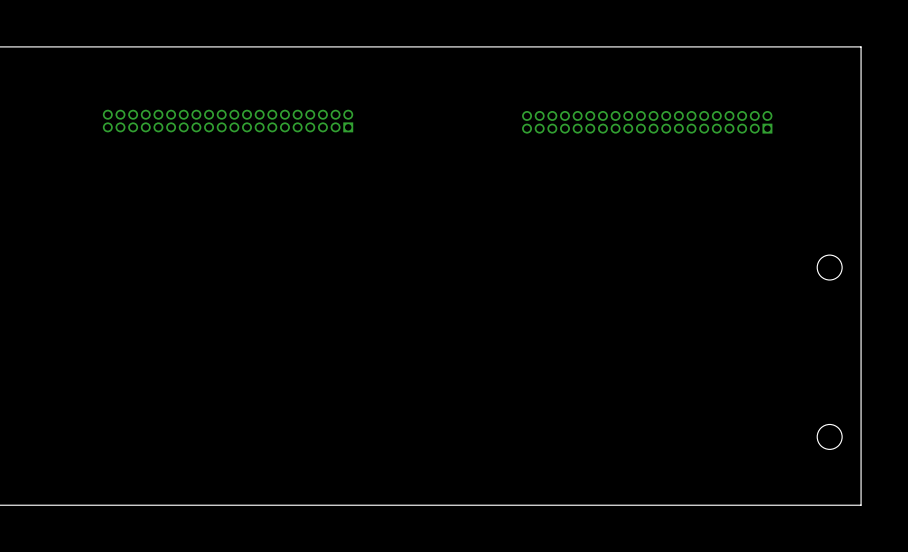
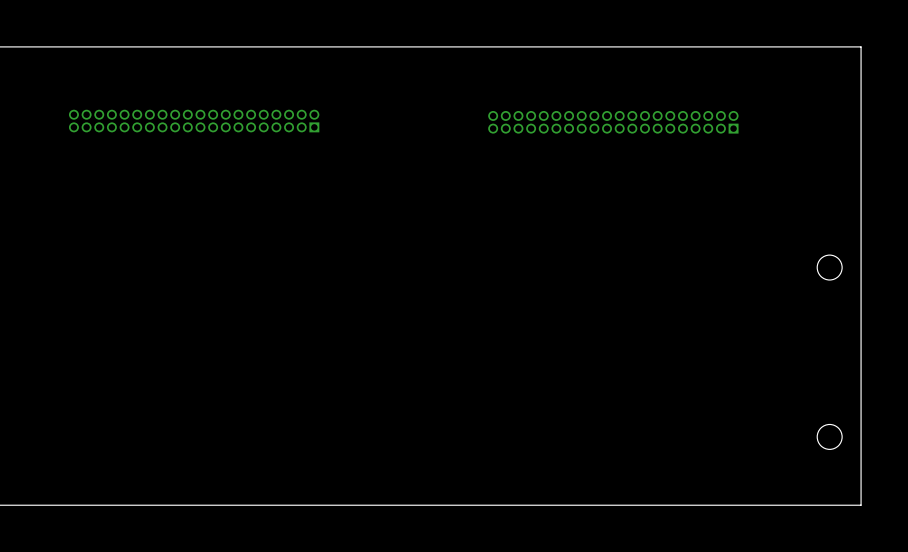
part position: (228, 121) -> (194, 121)
part position: (647, 122) -> (613, 122)

